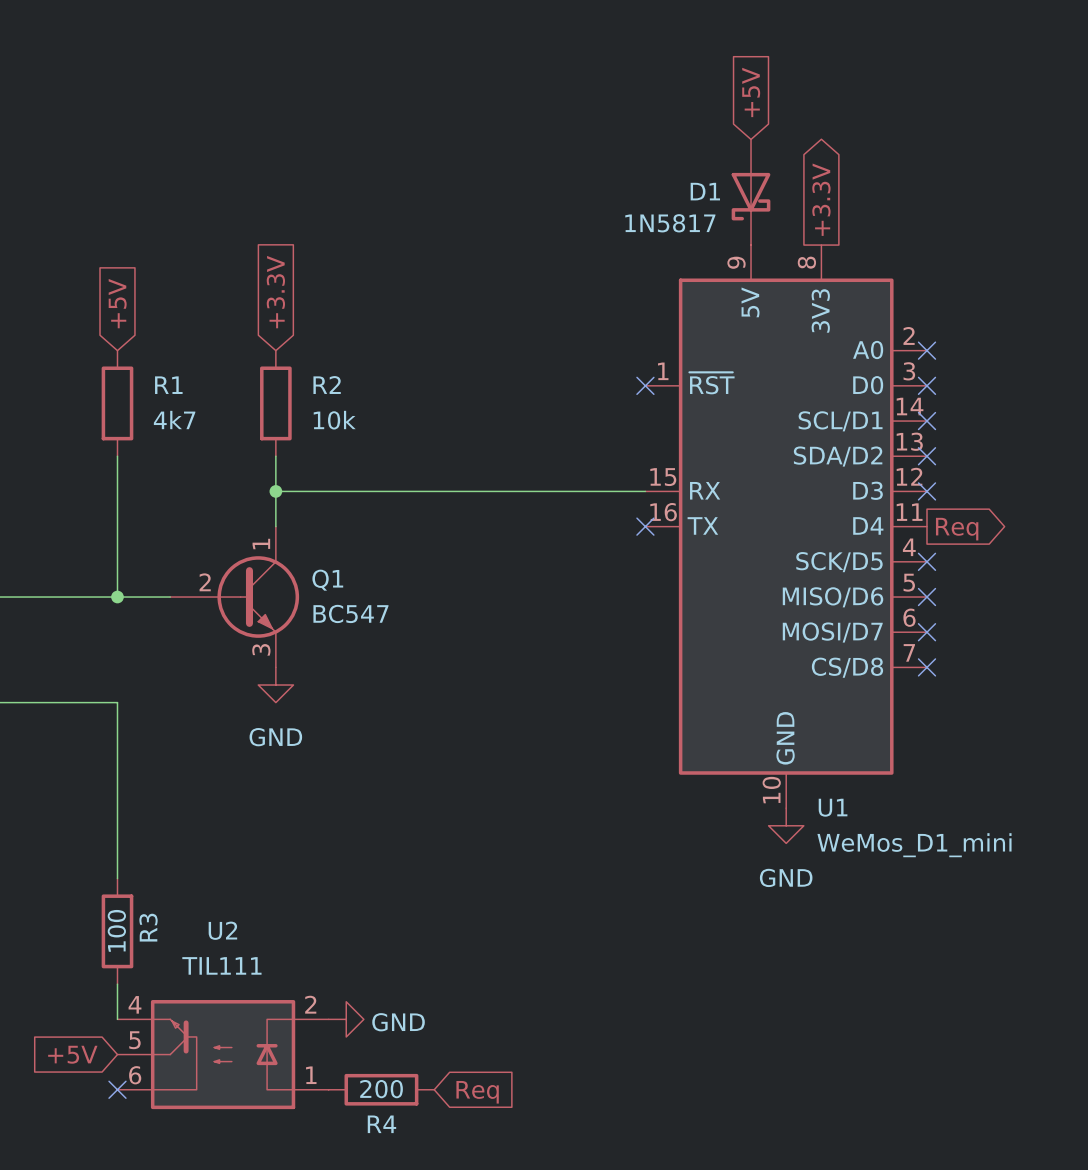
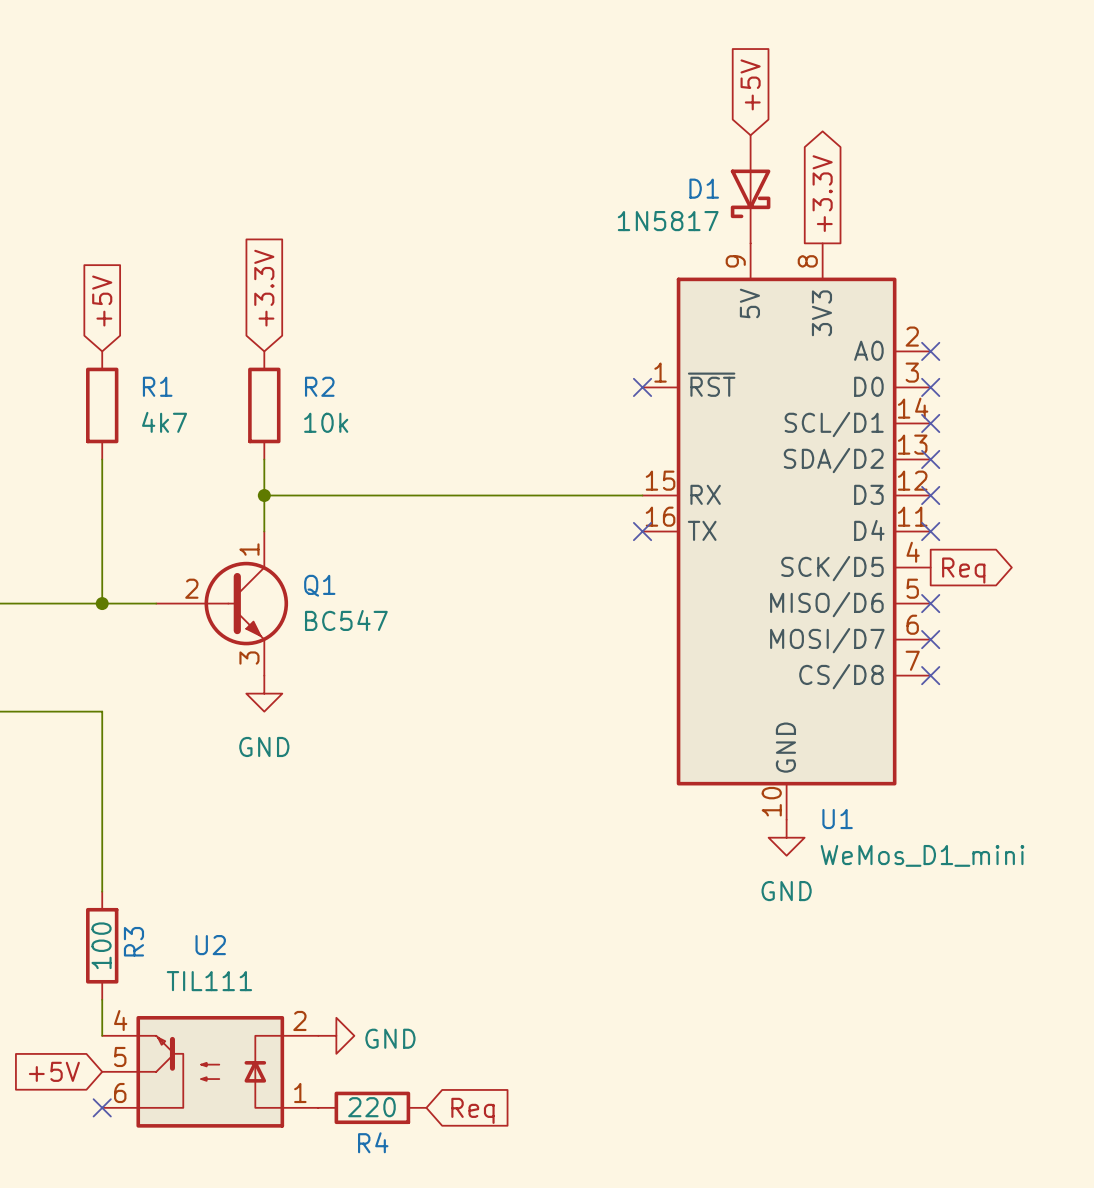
global label position: Req (957, 529) -> Req (963, 570)
no-connect mark position: (926, 561) -> (930, 531)
R4 value: 200 (381, 1089) -> 220 (371, 1107)

